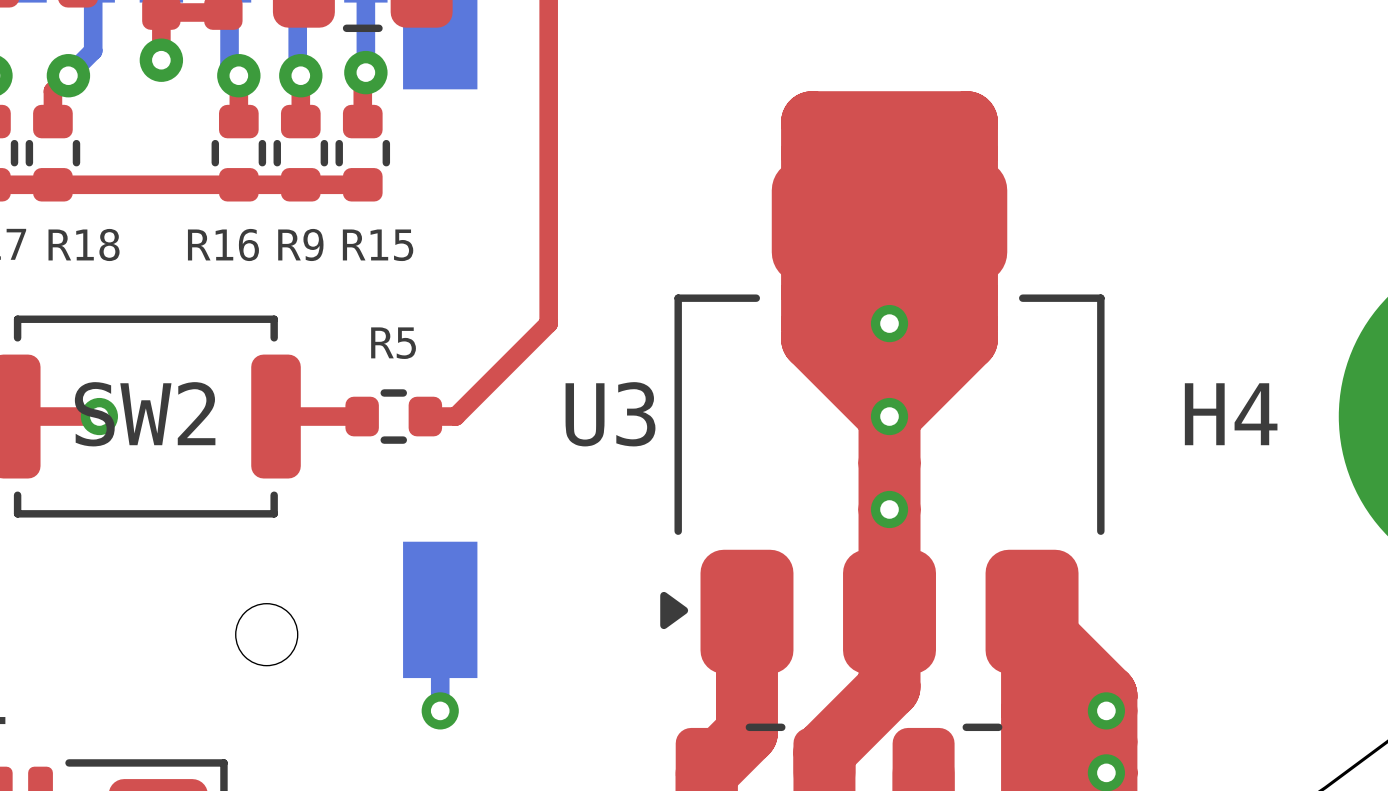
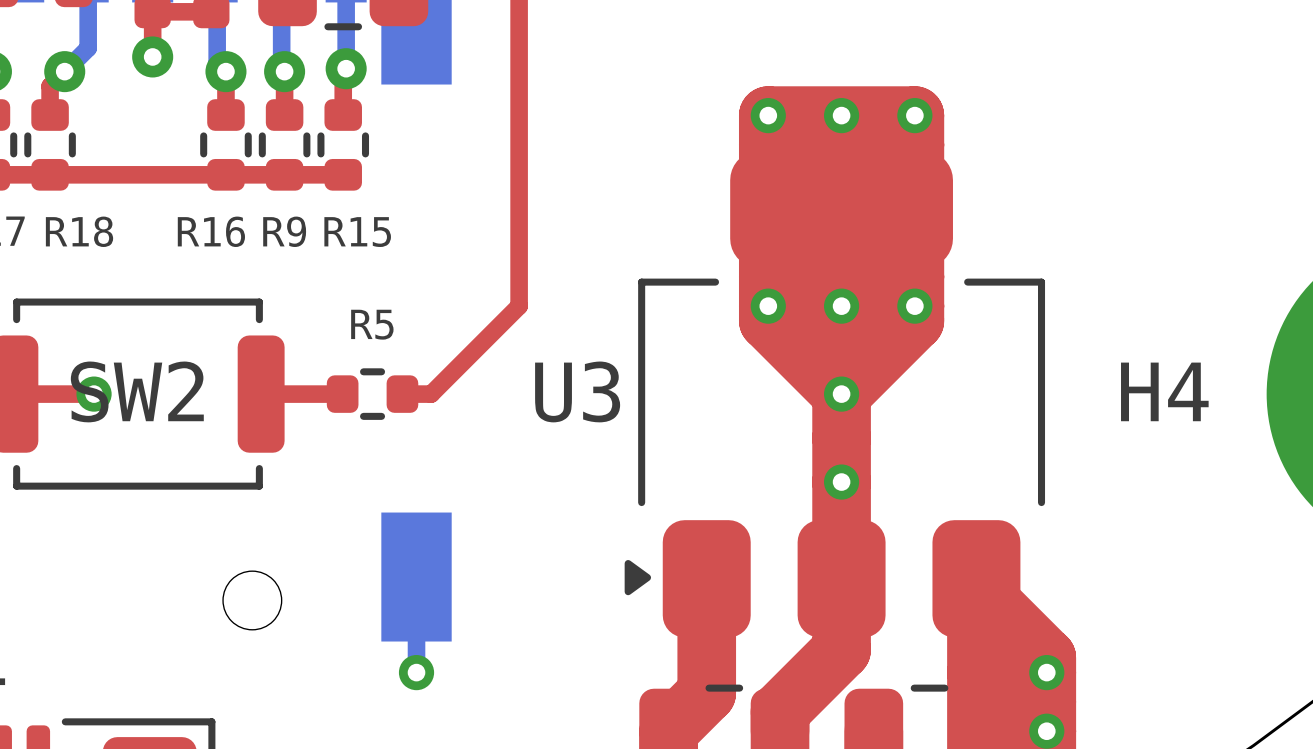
via: none -> (768, 115)
via: none -> (841, 115)
via: none -> (914, 115)
via: none -> (768, 306)
via: none -> (914, 306)

